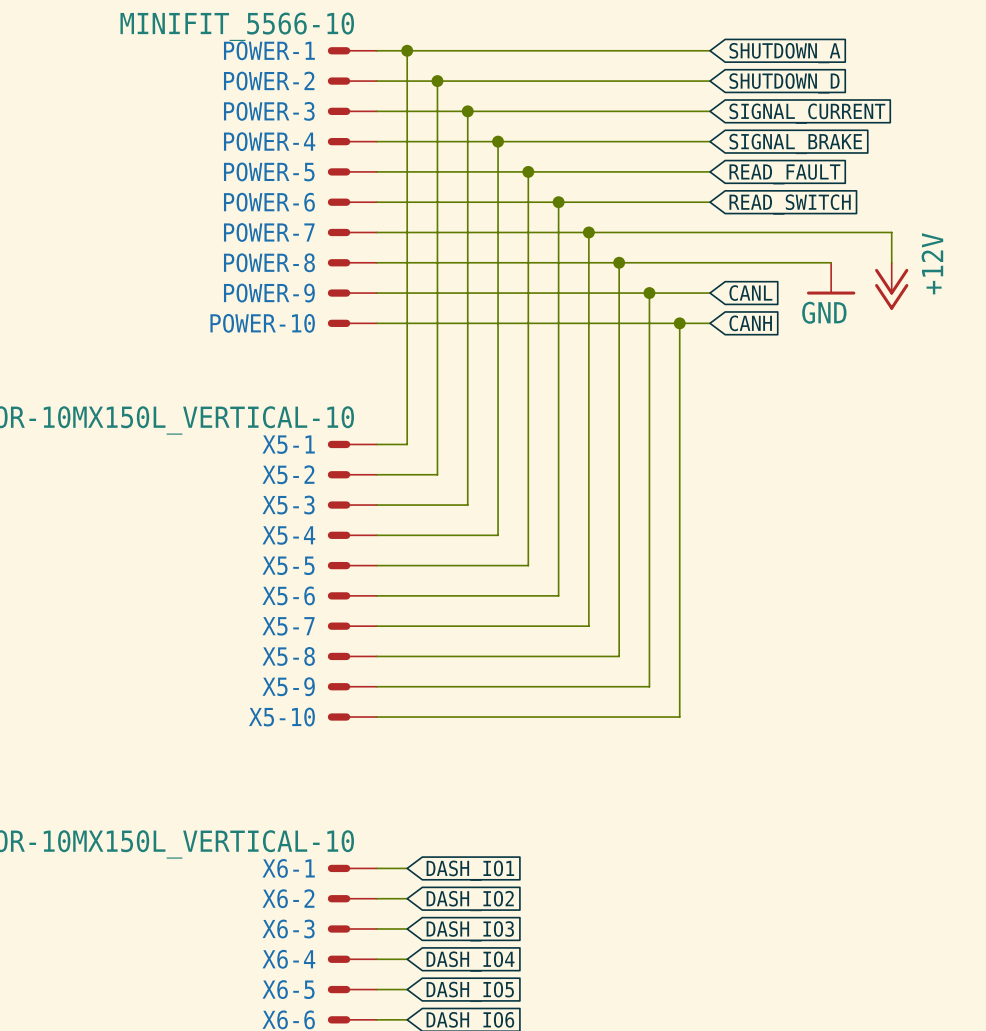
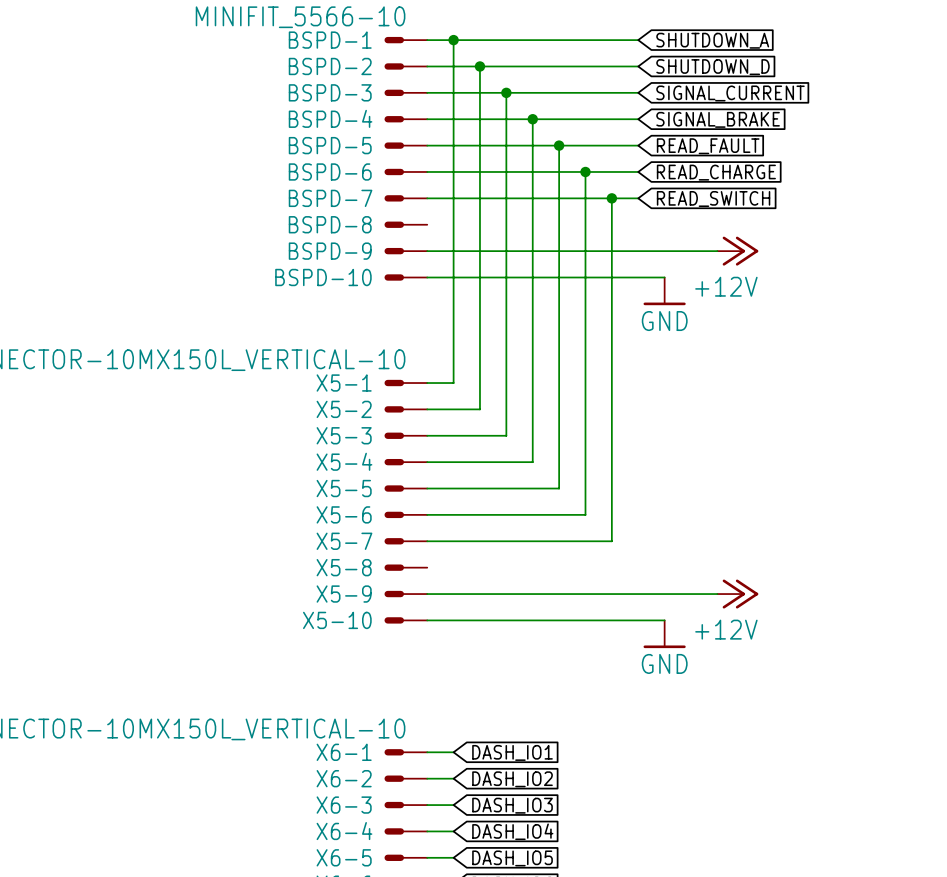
POWER-1 name: POWER-1 (269, 50) -> BSPD-1 (330, 40)
wire: (619, 50) (710, 50) -> none
global label position: SHUTDOWN_A (784, 53) -> SHUTDOWN_A (712, 40)
POWER-2 name: POWER-2 (269, 81) -> BSPD-2 (330, 66)
wire: (619, 81) (710, 81) -> none
global label position: SHUTDOWN_D (784, 83) -> SHUTDOWN_D (712, 67)
POWER-3 name: POWER-3 (269, 111) -> BSPD-3 (330, 92)
wire: (619, 111) (710, 111) -> none
global label position: SIGNAL_CURRENT (807, 113) -> SIGNAL_CURRENT (730, 93)
POWER-4 name: POWER-4 (269, 141) -> BSPD-4 (330, 118)
wire: (619, 141) (710, 141) -> none
global label position: SIGNAL_BRAKE (795, 143) -> SIGNAL_BRAKE (718, 119)
POWER-5 name: POWER-5 (269, 171) -> BSPD-5 (330, 145)
wire: (619, 171) (710, 171) -> none
global label position: READ_FAULT (784, 174) -> READ_FAULT (708, 146)
POWER-6 name: POWER-6 (269, 202) -> BSPD-6 (330, 171)
wire: (619, 202) (710, 202) -> none
global label: none -> READ_CHARGE (716, 172)
global label position: READ_SWITCH (790, 204) -> READ_SWITCH (713, 198)
POWER-7 name: POWER-7 (269, 232) -> BSPD-7 (330, 198)
wire: (619, 232) (891, 232) (891, 262) -> none
POWER-8 name: POWER-8 (269, 262) -> BSPD-8 (330, 224)
wire: (376, 262) (831, 262) -> none
wire: (619, 262) (619, 656) (376, 656) -> none
junction: (619, 262) -> none
power symbol text position: +12V (932, 263) -> +12V (726, 286)
power symbol position: GND (831, 278) -> GND (664, 291)
power symbol position: +12V (891, 286) -> +12V (737, 251)
power symbol rotation: 0° (891, 289) -> 90° counterclockwise (740, 251)
POWER-9 name: POWER-9 (269, 293) -> BSPD-9 (330, 251)
wire: (649, 293) (649, 686) -> (717, 594) (664, 594)
junction: (649, 293) -> none
global label: CANL (750, 293) -> none
power symbol text position: GND (824, 312) -> GND (664, 321)
POWER-10 name: POWER-10 (262, 323) -> BSPD-10 (323, 277)
wire: (649, 323) (710, 323) -> none
wire: (679, 323) (679, 717) (649, 717) -> none
junction: (679, 323) -> none
global label: CANH (750, 323) -> none
power symbol: none -> +12V (737, 594)
power symbol: none -> GND (664, 634)

